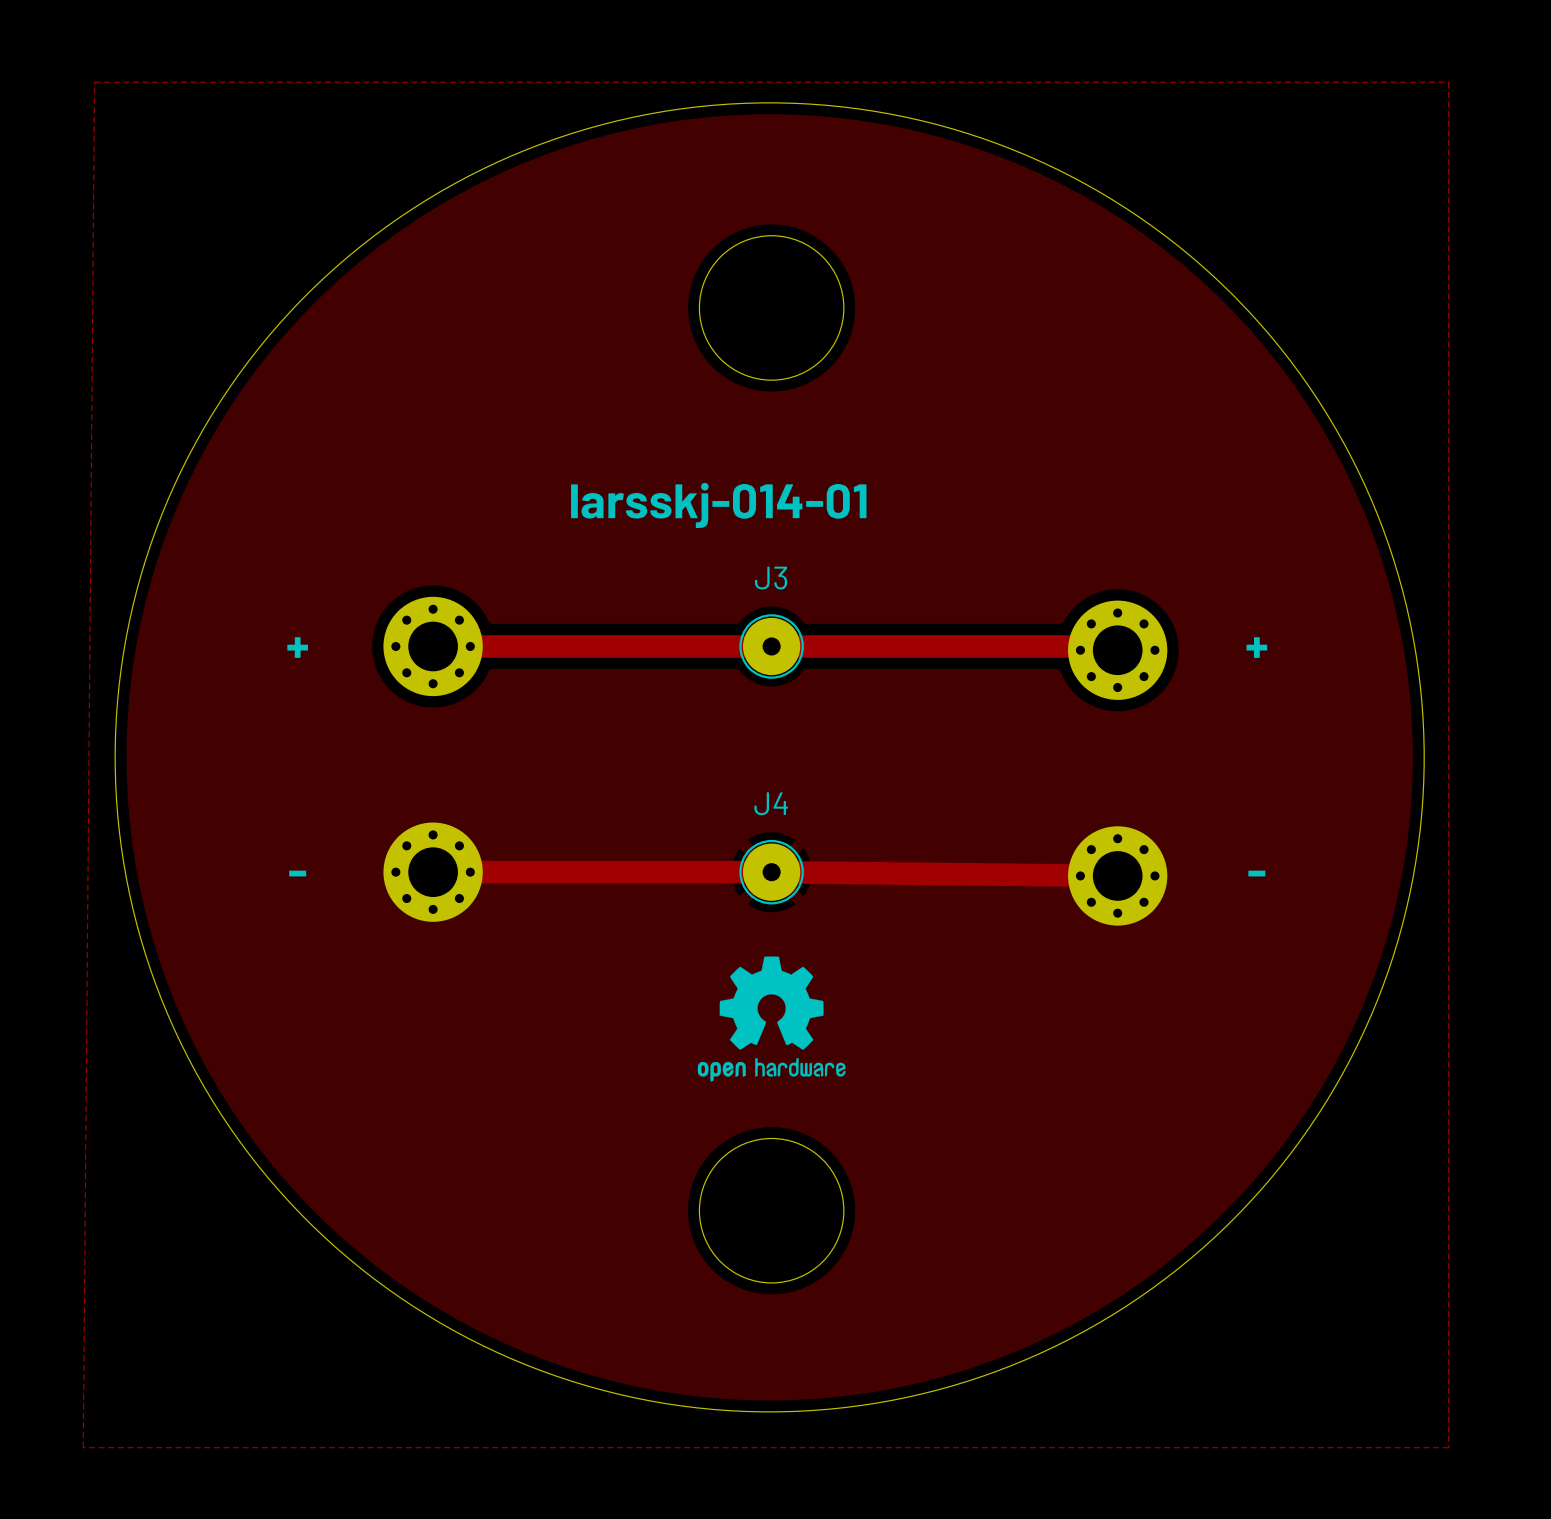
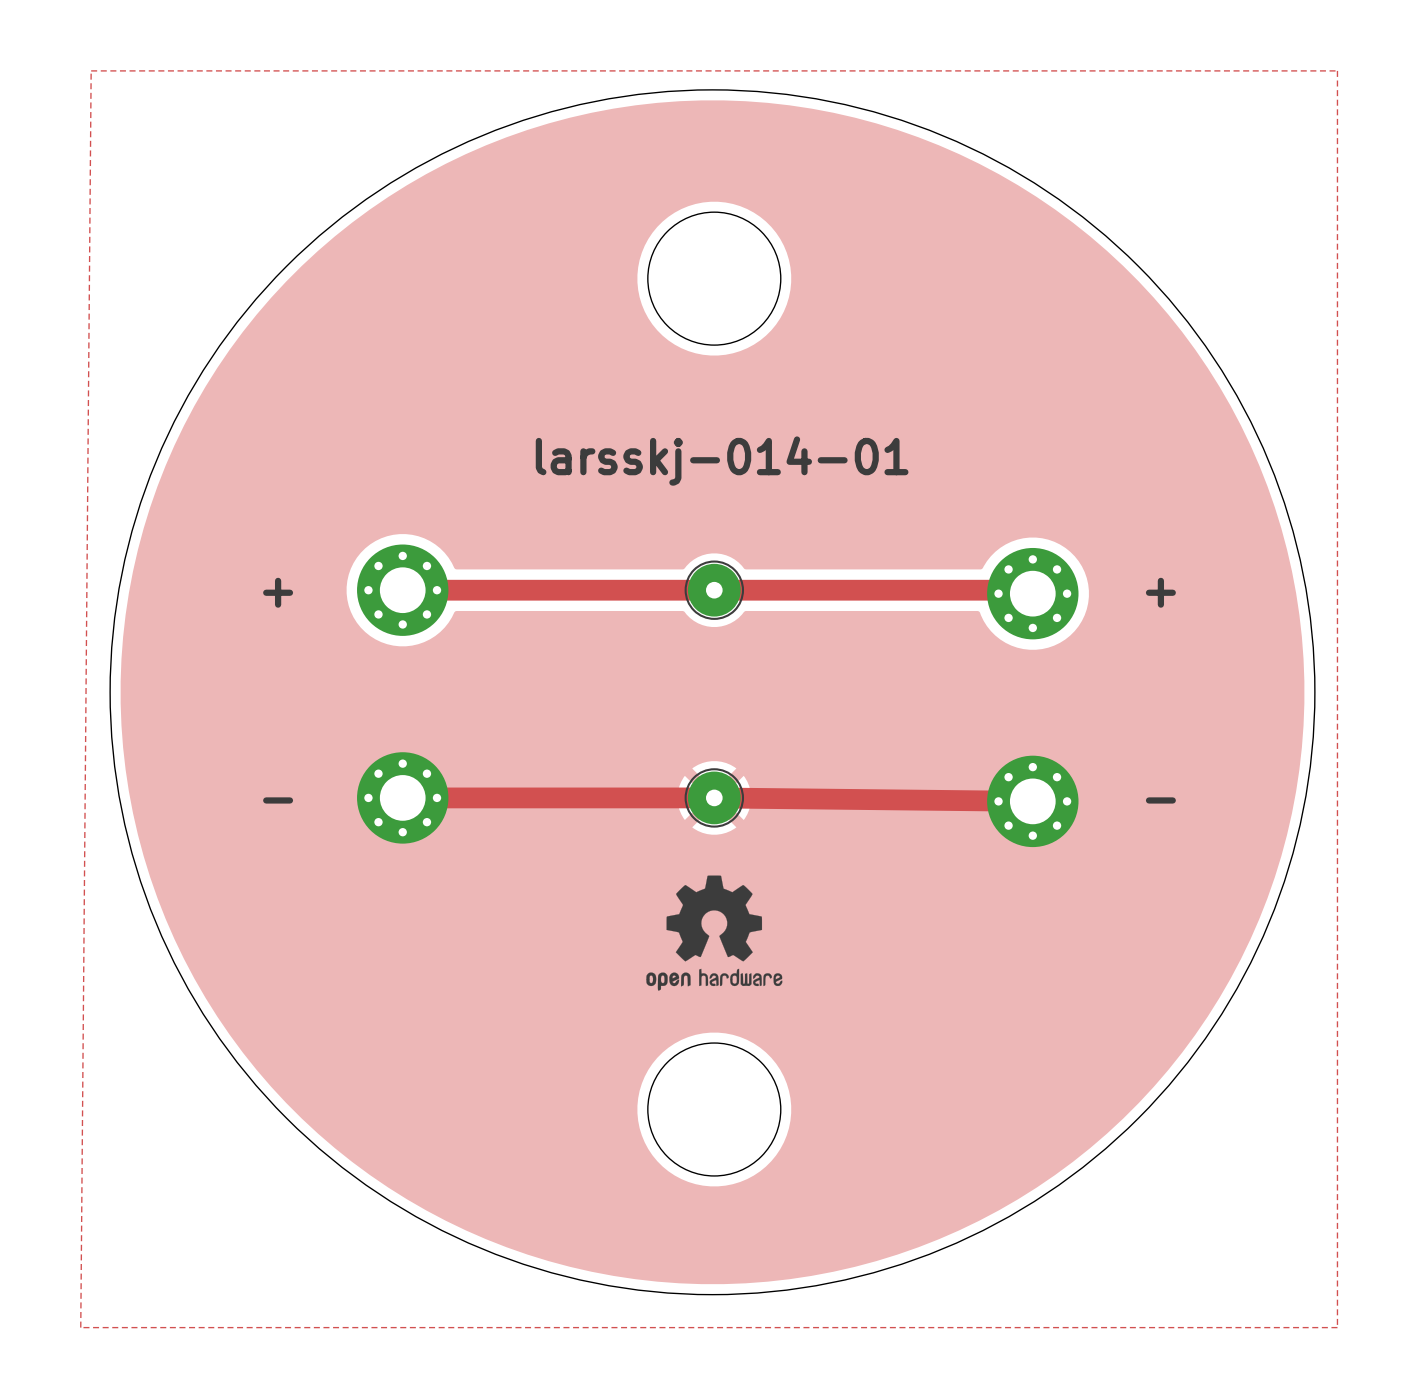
J3 name: J3 (771, 578) -> none
J4 name: J4 (771, 803) -> none

